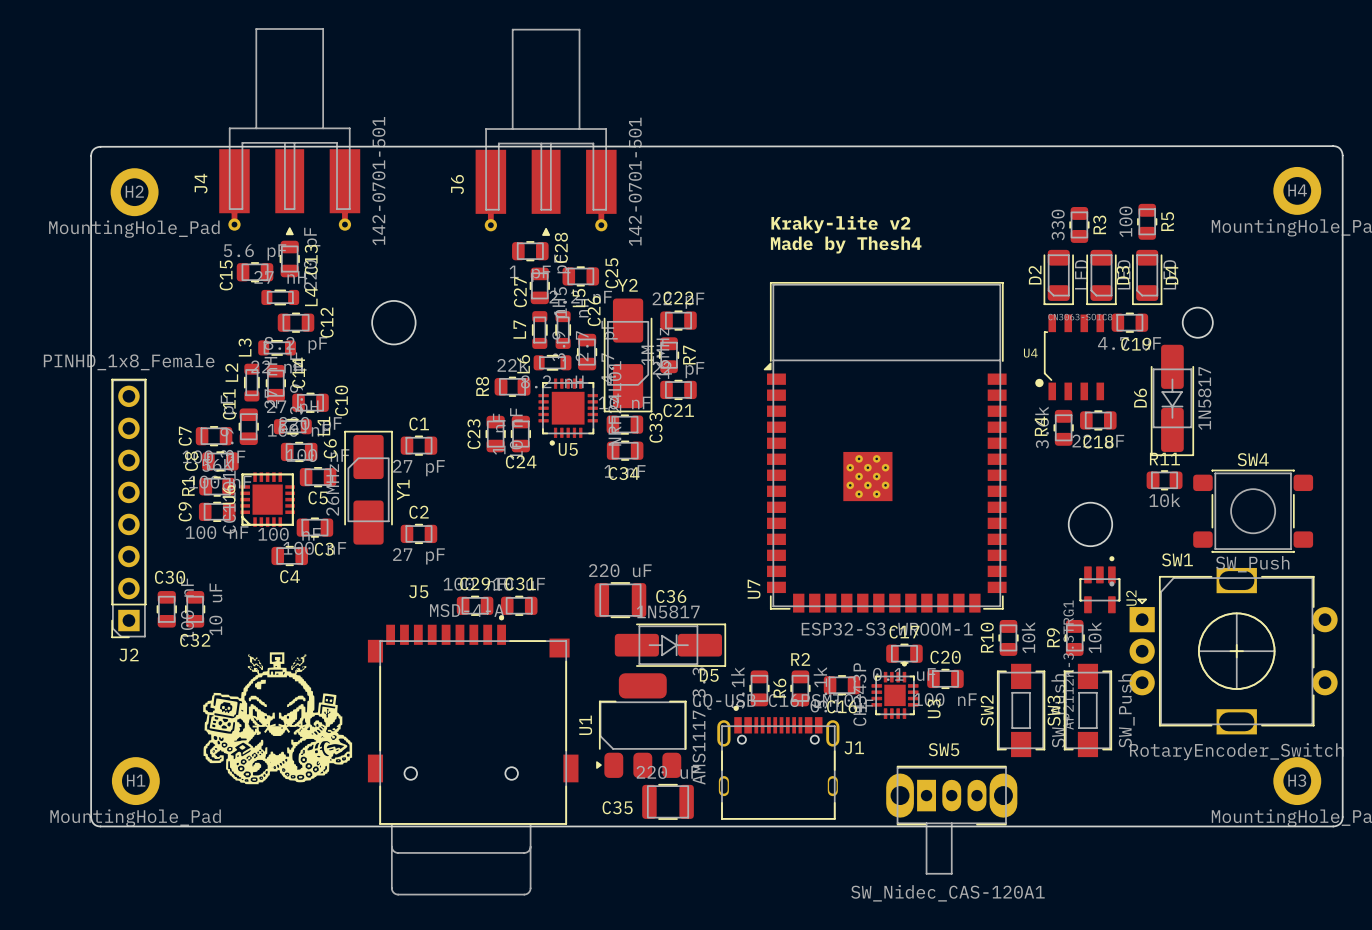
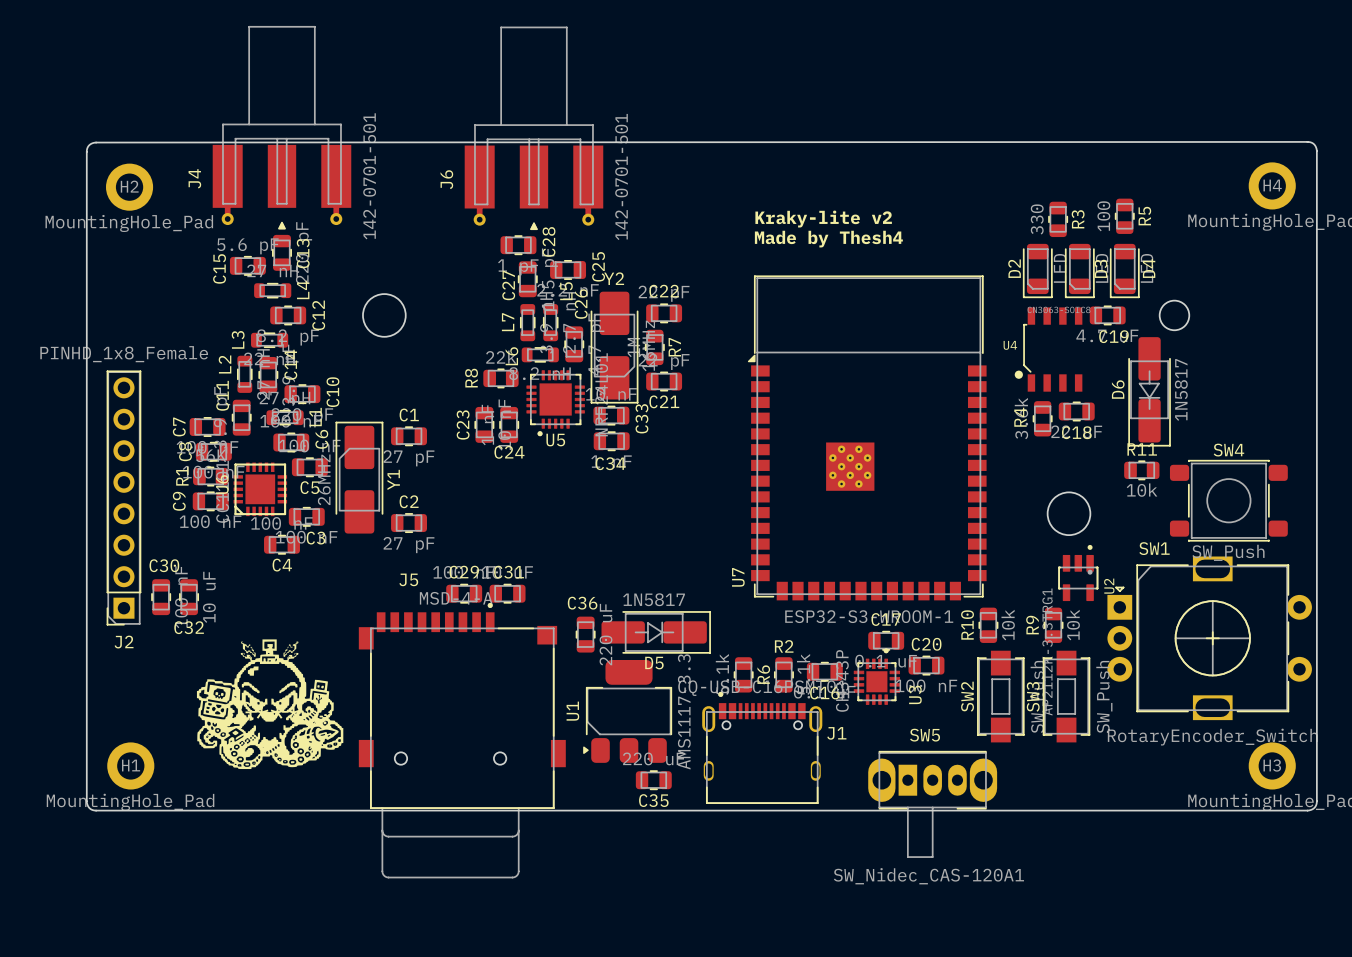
C36 value position: 220 uF (620, 570) -> 220 uF (606, 634)
C36 footprint: [594, 582, 647, 619] -> [575, 616, 596, 653]
C36 name position: C36 (671, 596) -> C36 (582, 603)
D5 name position: D5 (709, 675) -> D5 (654, 663)
C35 footprint: [642, 783, 694, 820] -> [635, 770, 672, 791]
C35 name position: C35 (617, 807) -> C35 (653, 800)

